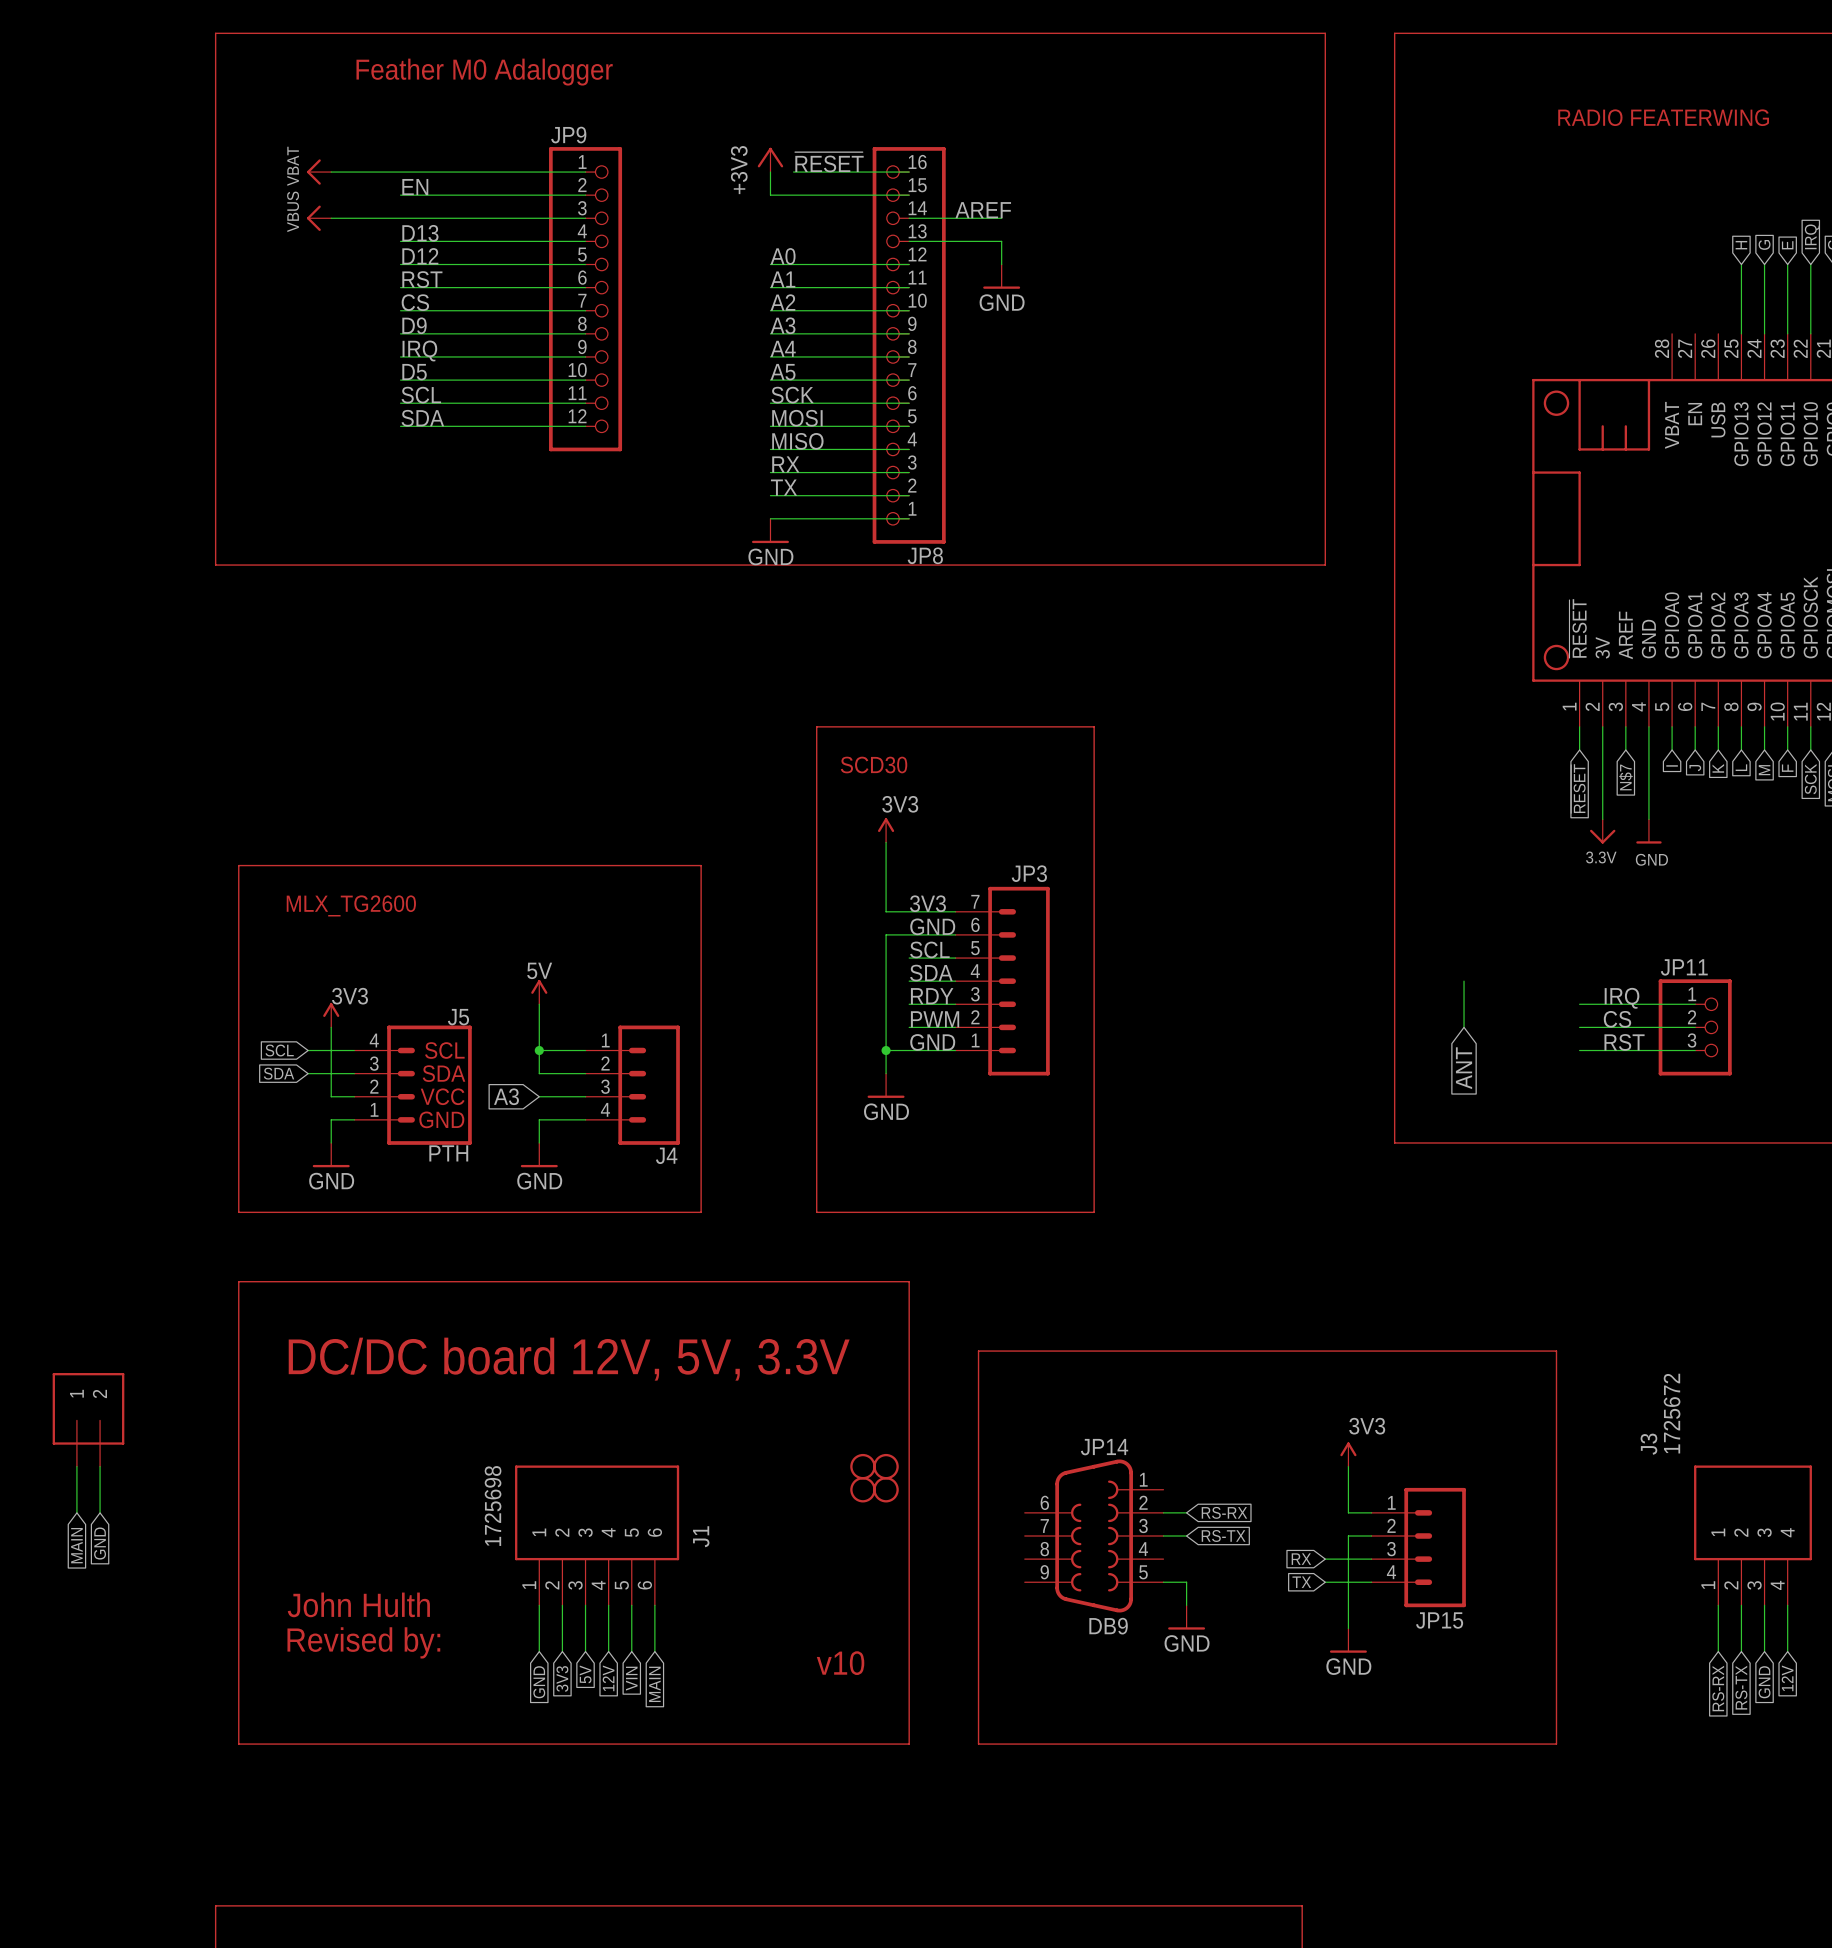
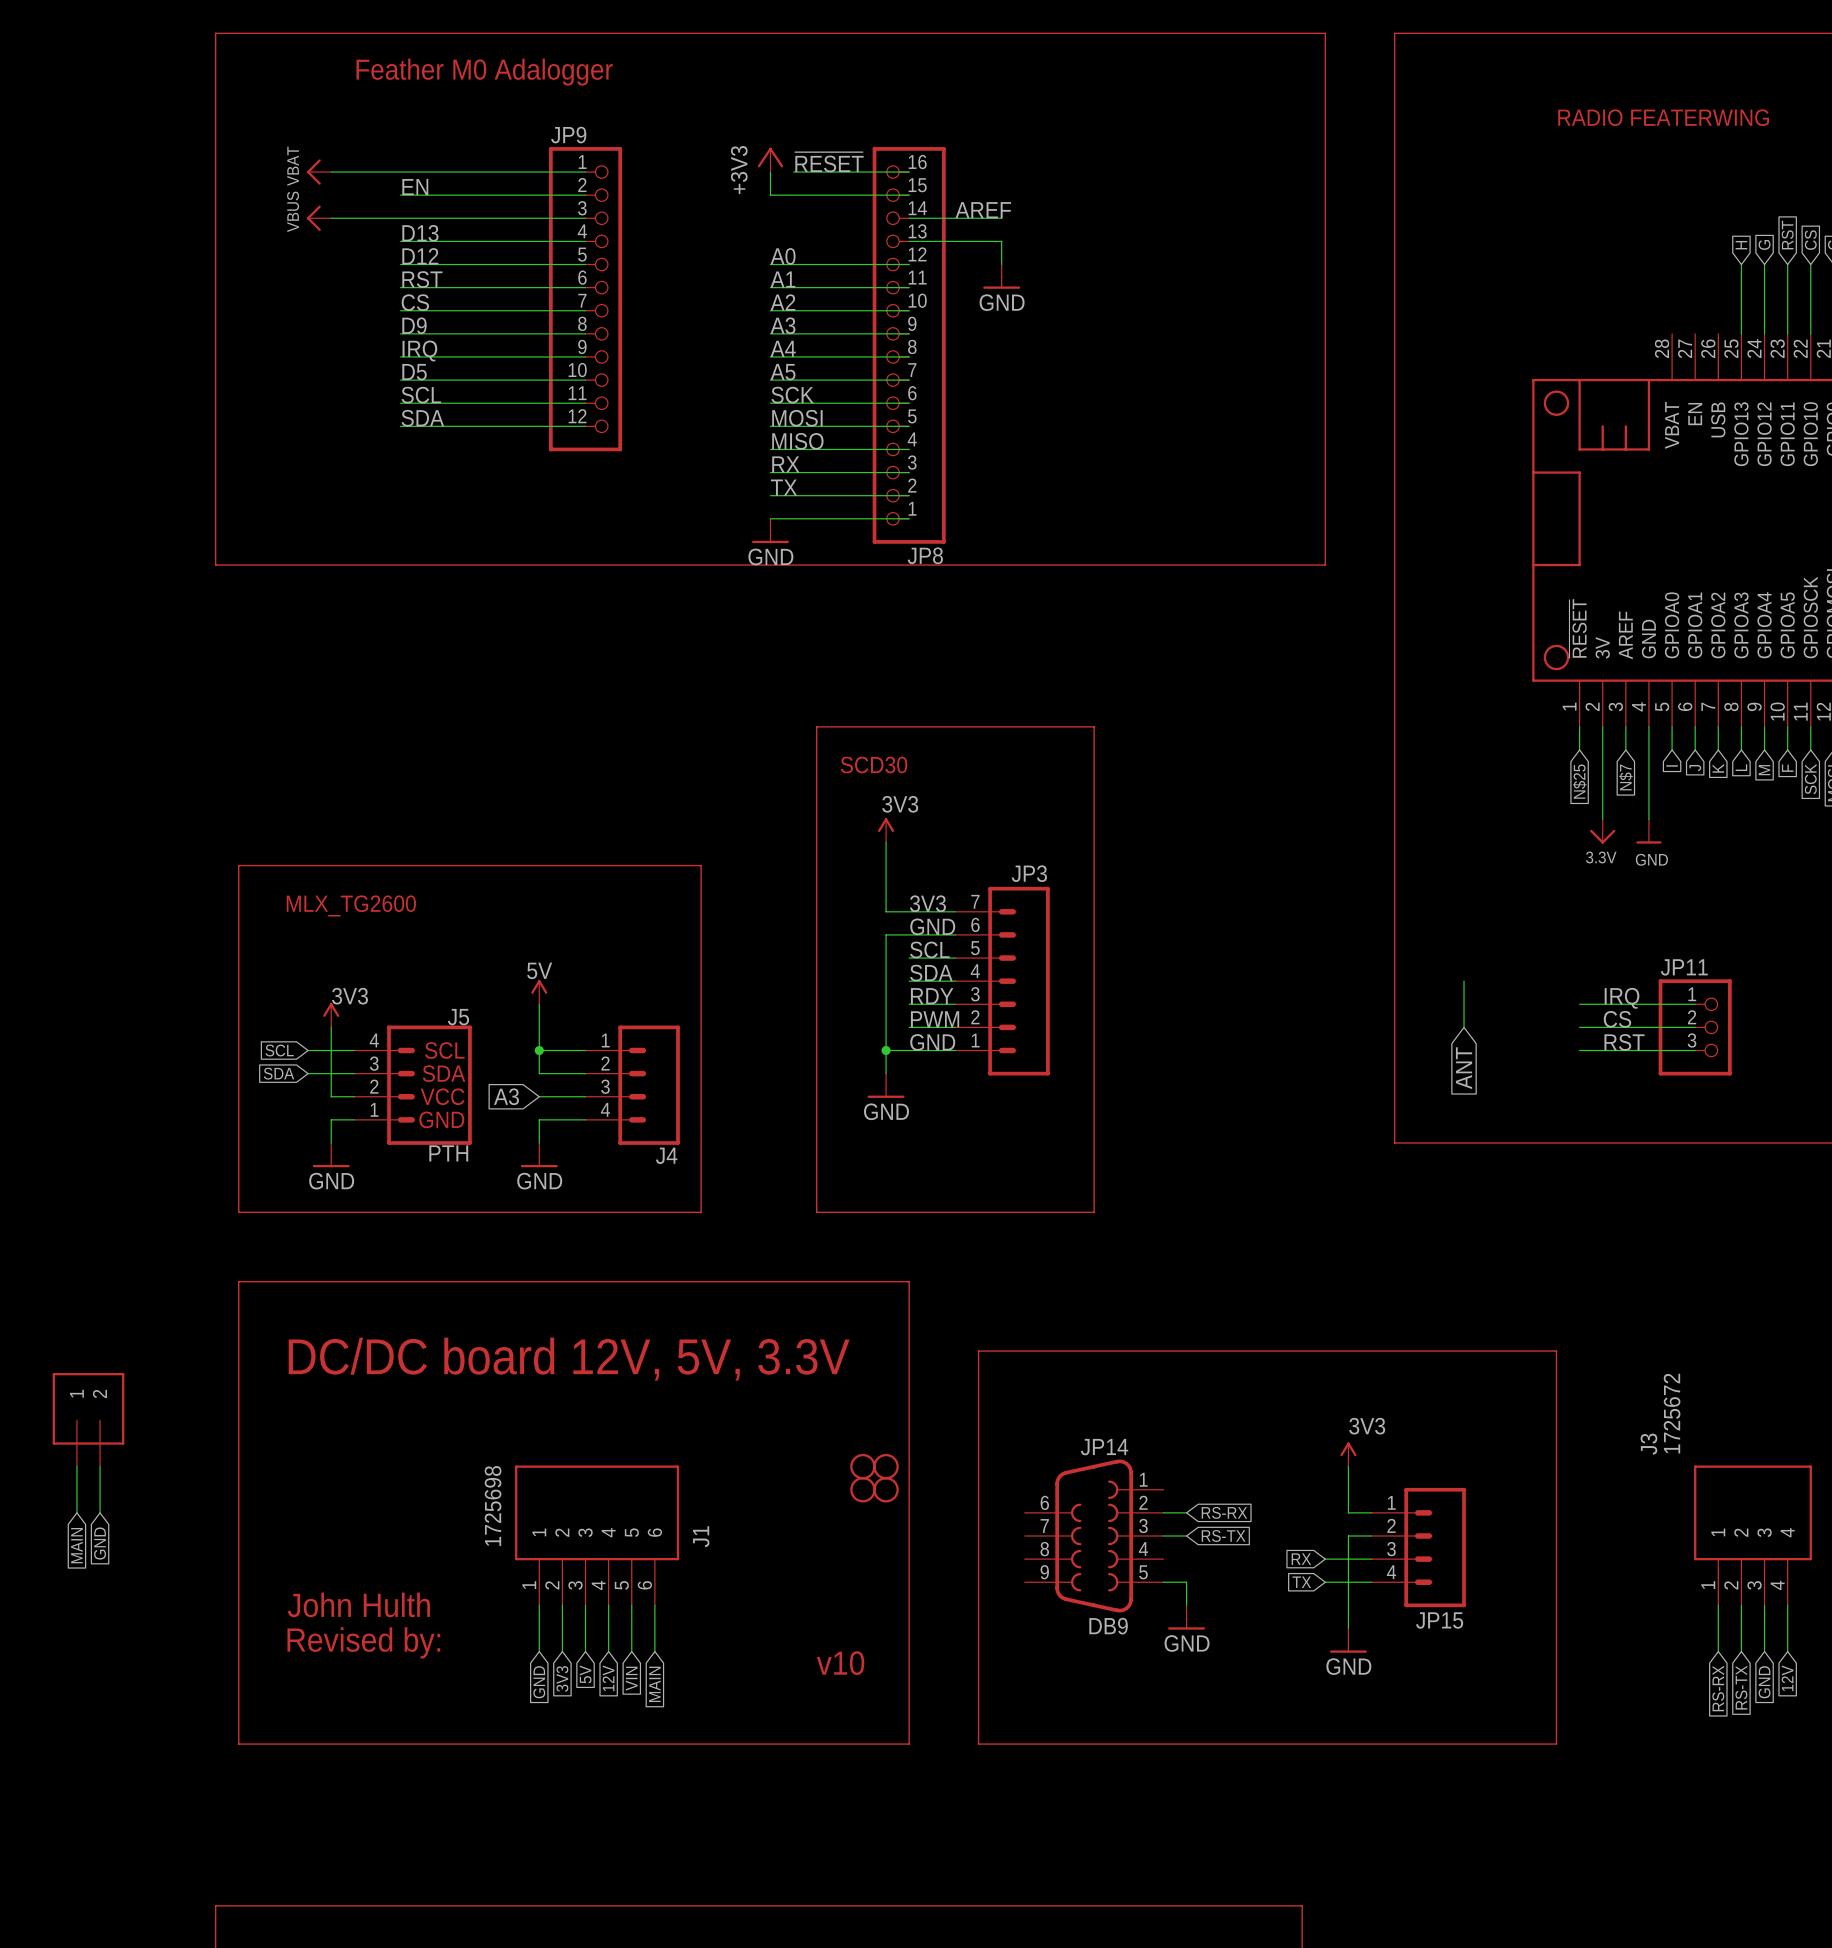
global label: IRQ (1812, 236) -> CS (1810, 240)
global label: E (1787, 245) -> RST (1787, 235)
global label: ~{RESET} (1578, 788) -> N$25 (1579, 781)

